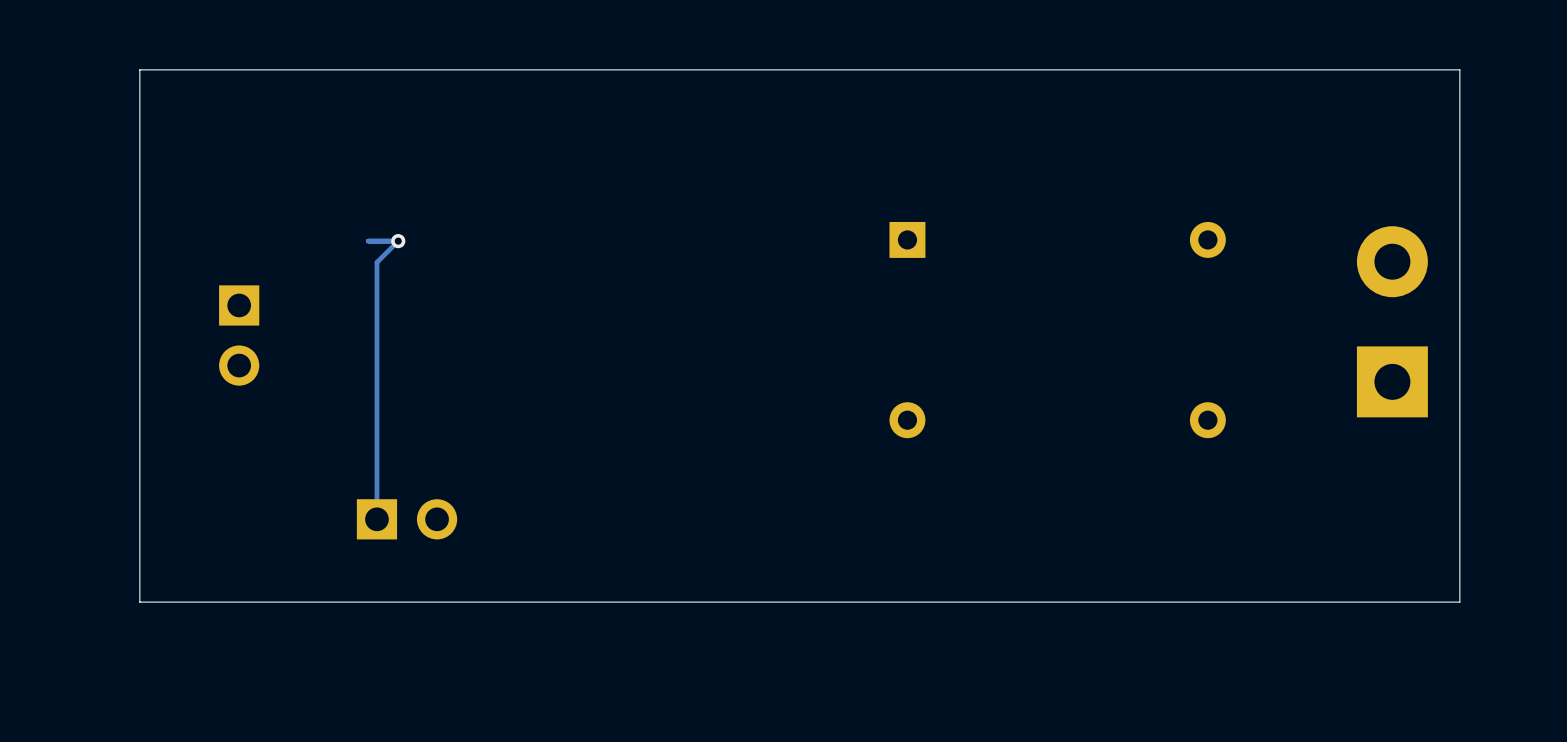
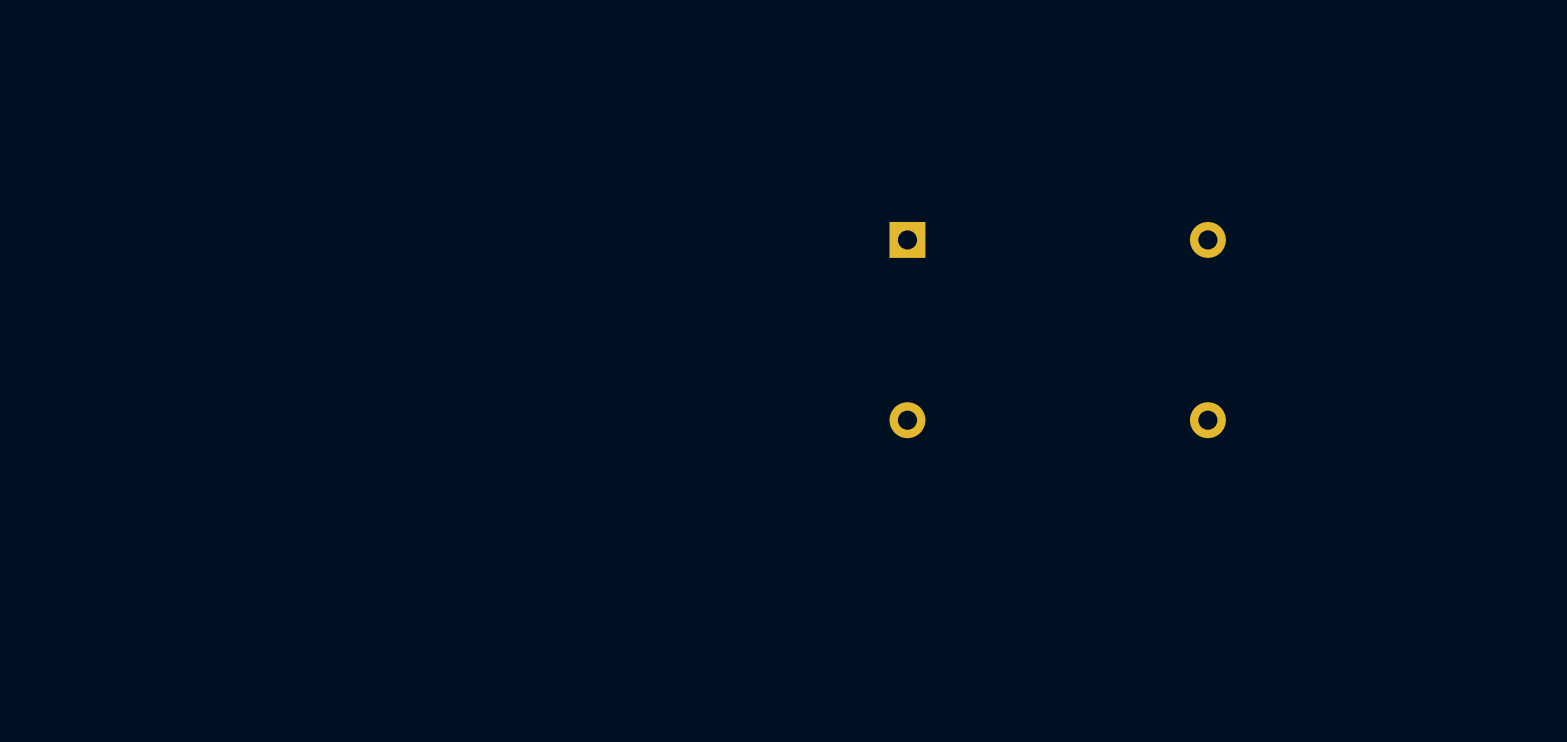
board edge: (1459, 69) (139, 69) (139, 602) (1459, 602) (1459, 69) -> none
track: (368, 241) (398, 241) (376, 262) (376, 519) -> none
via: (398, 241) -> none
part: (1392, 321) -> none
part: (239, 335) -> none
part: (407, 519) -> none

